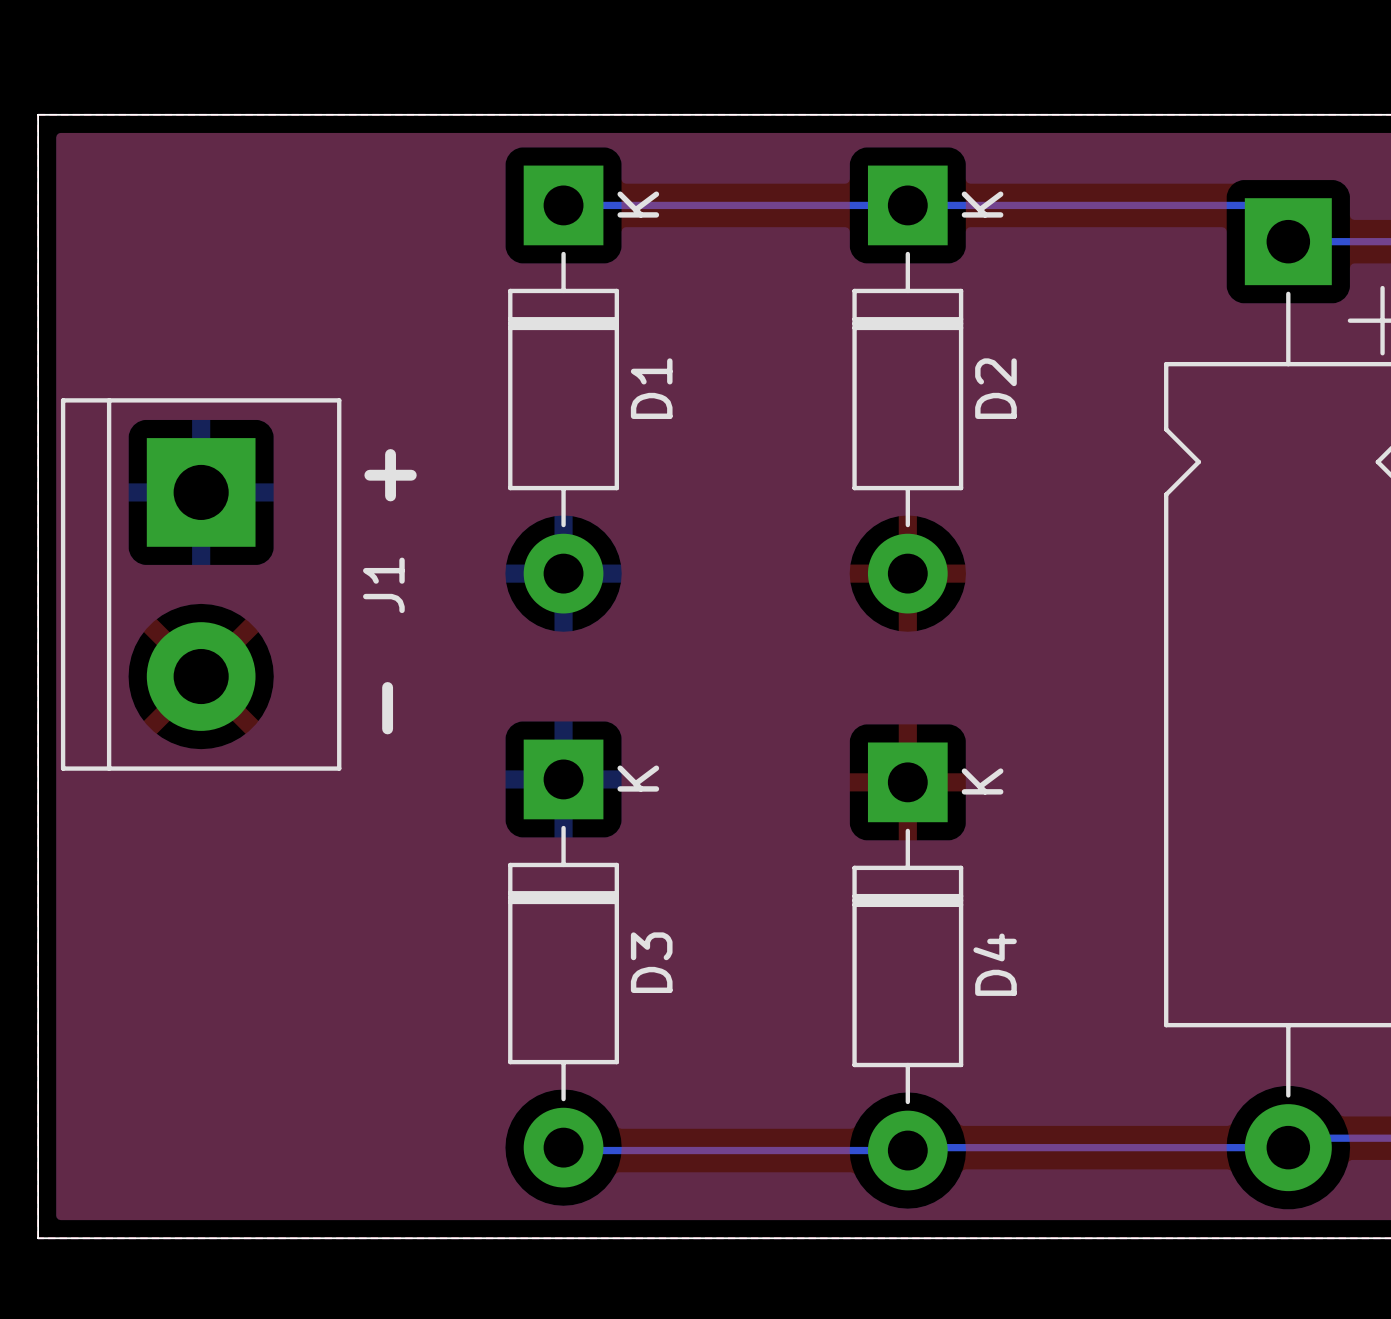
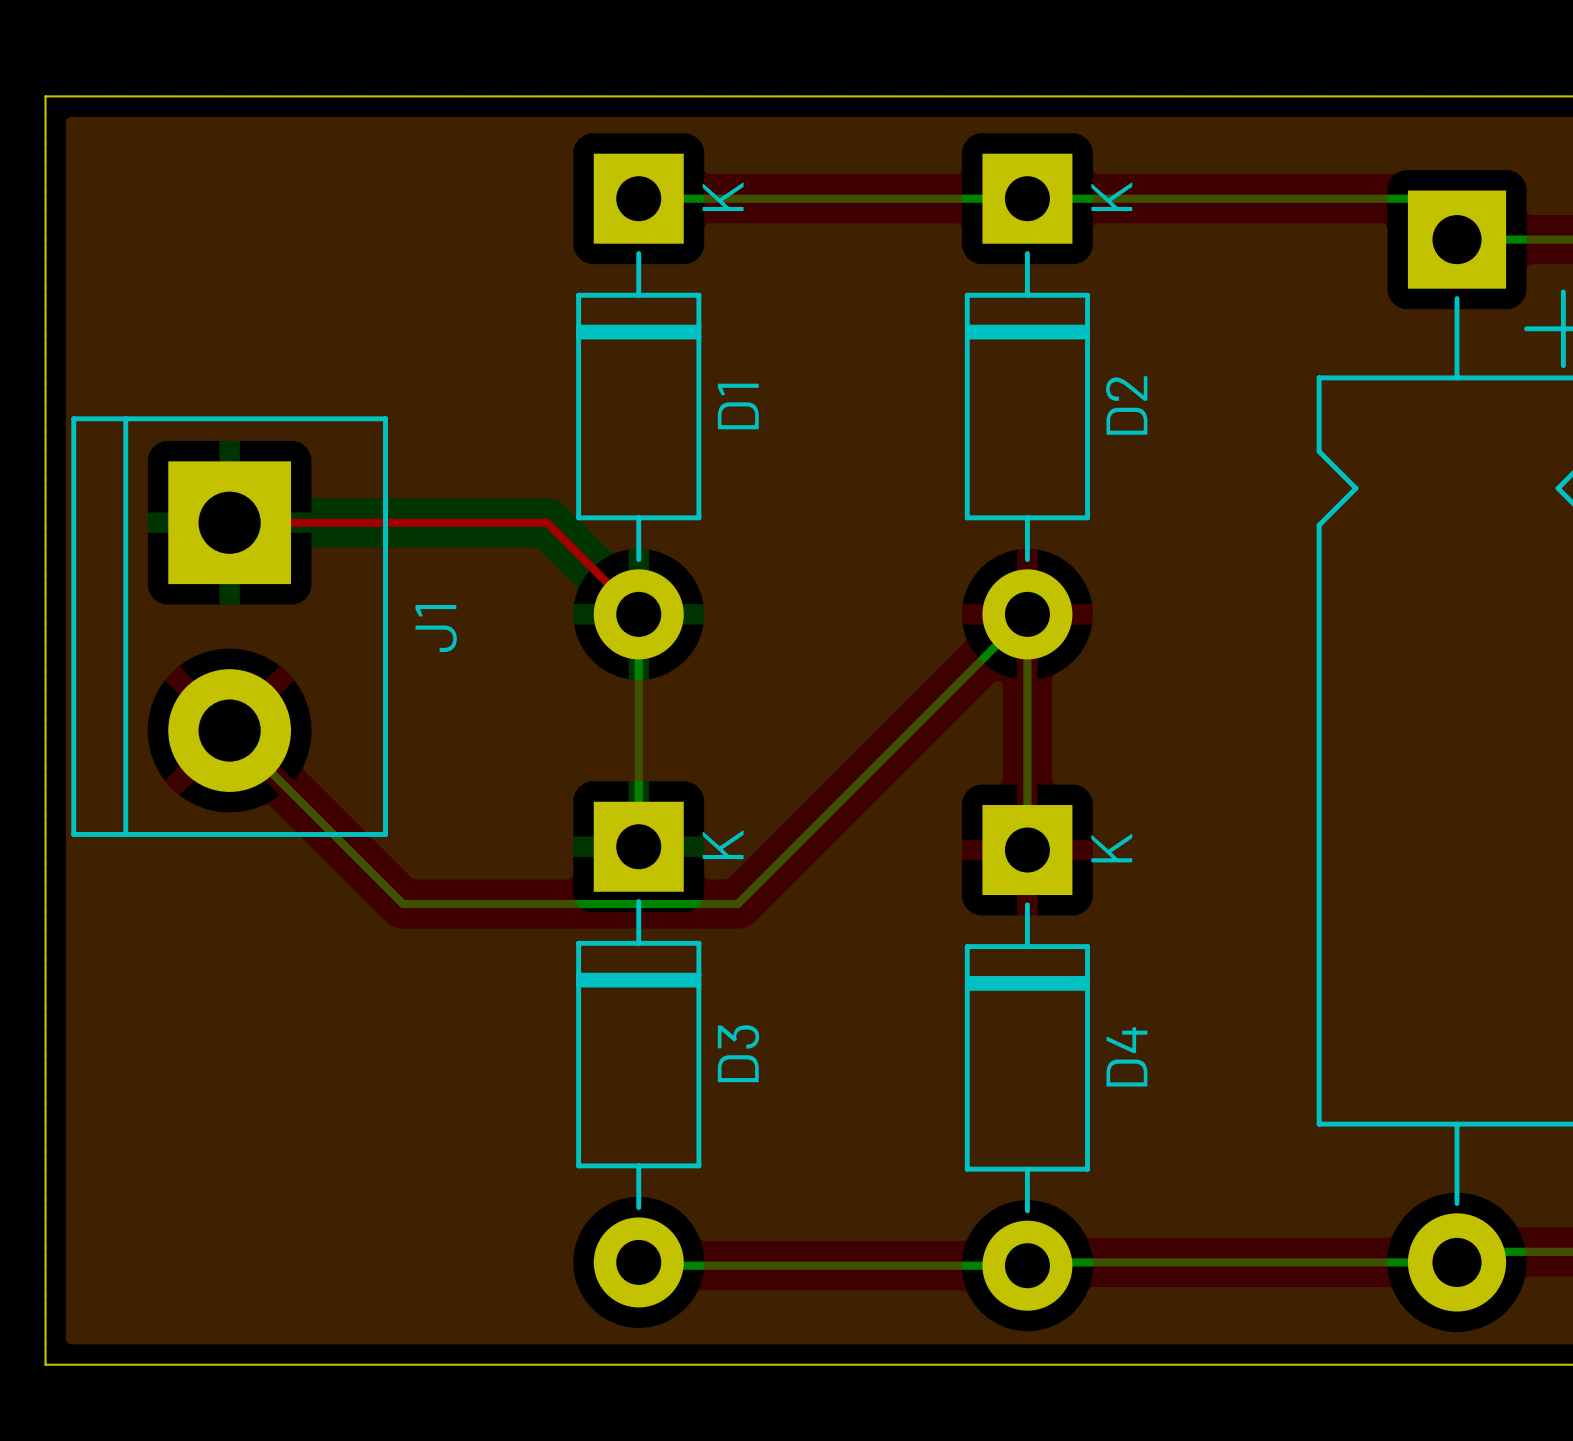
text: + (390, 475) -> none
top track: none -> (229, 522) (547, 522) (638, 614)
bottom track: none -> (638, 614) (638, 846)
bottom track: none -> (229, 730) (403, 904) (737, 904) (1027, 614) (1027, 850)
text: - (387, 708) -> none

